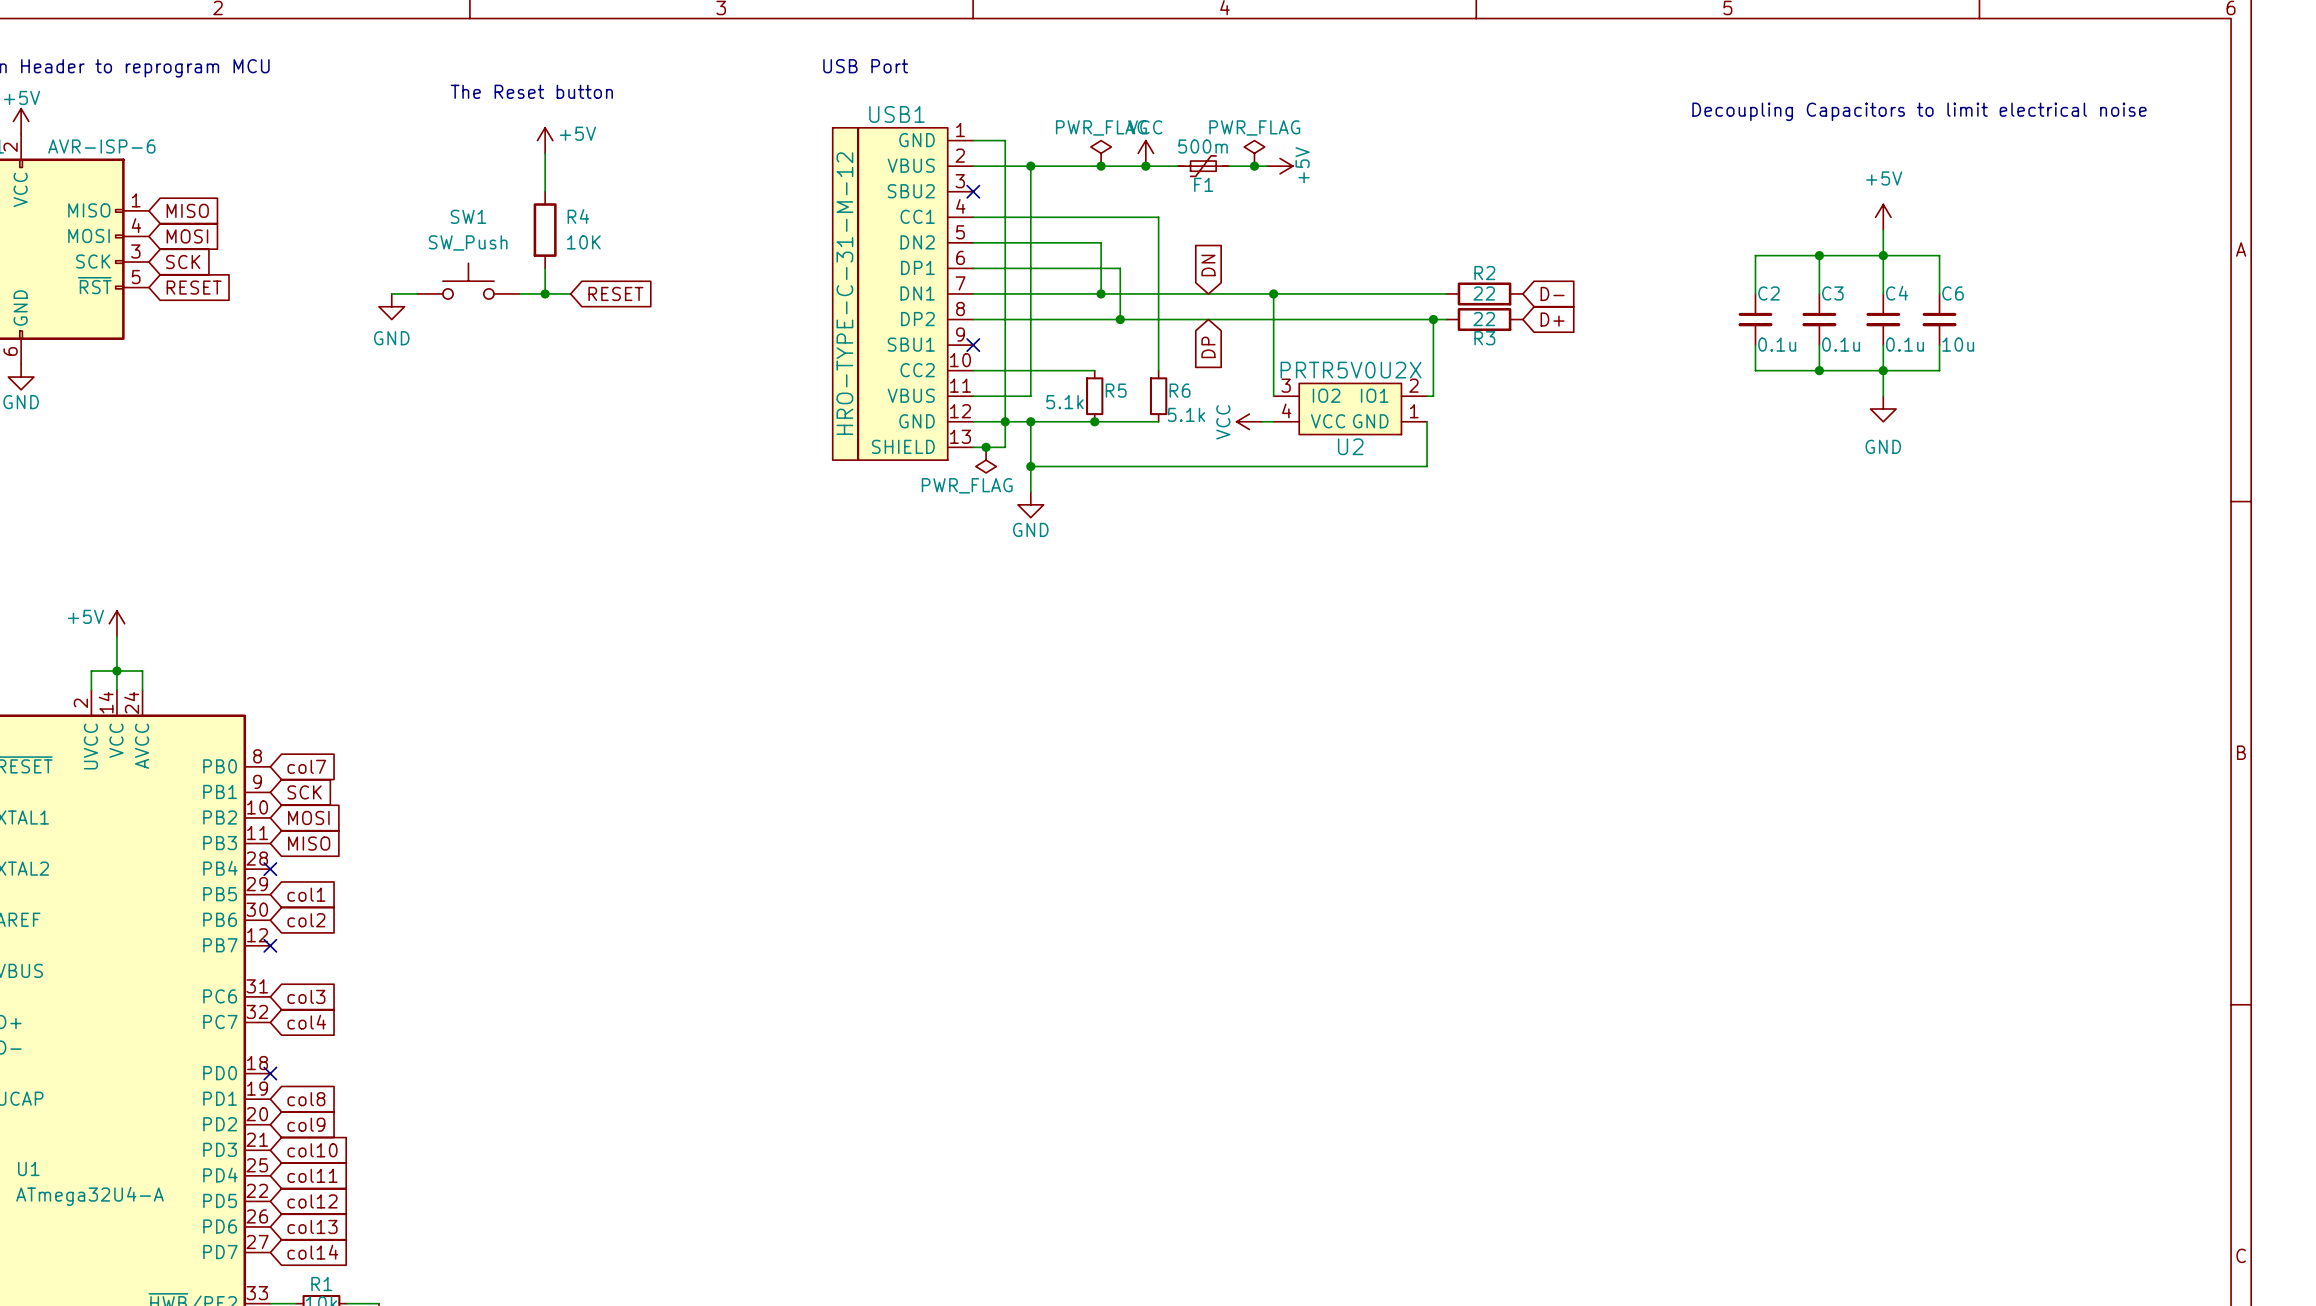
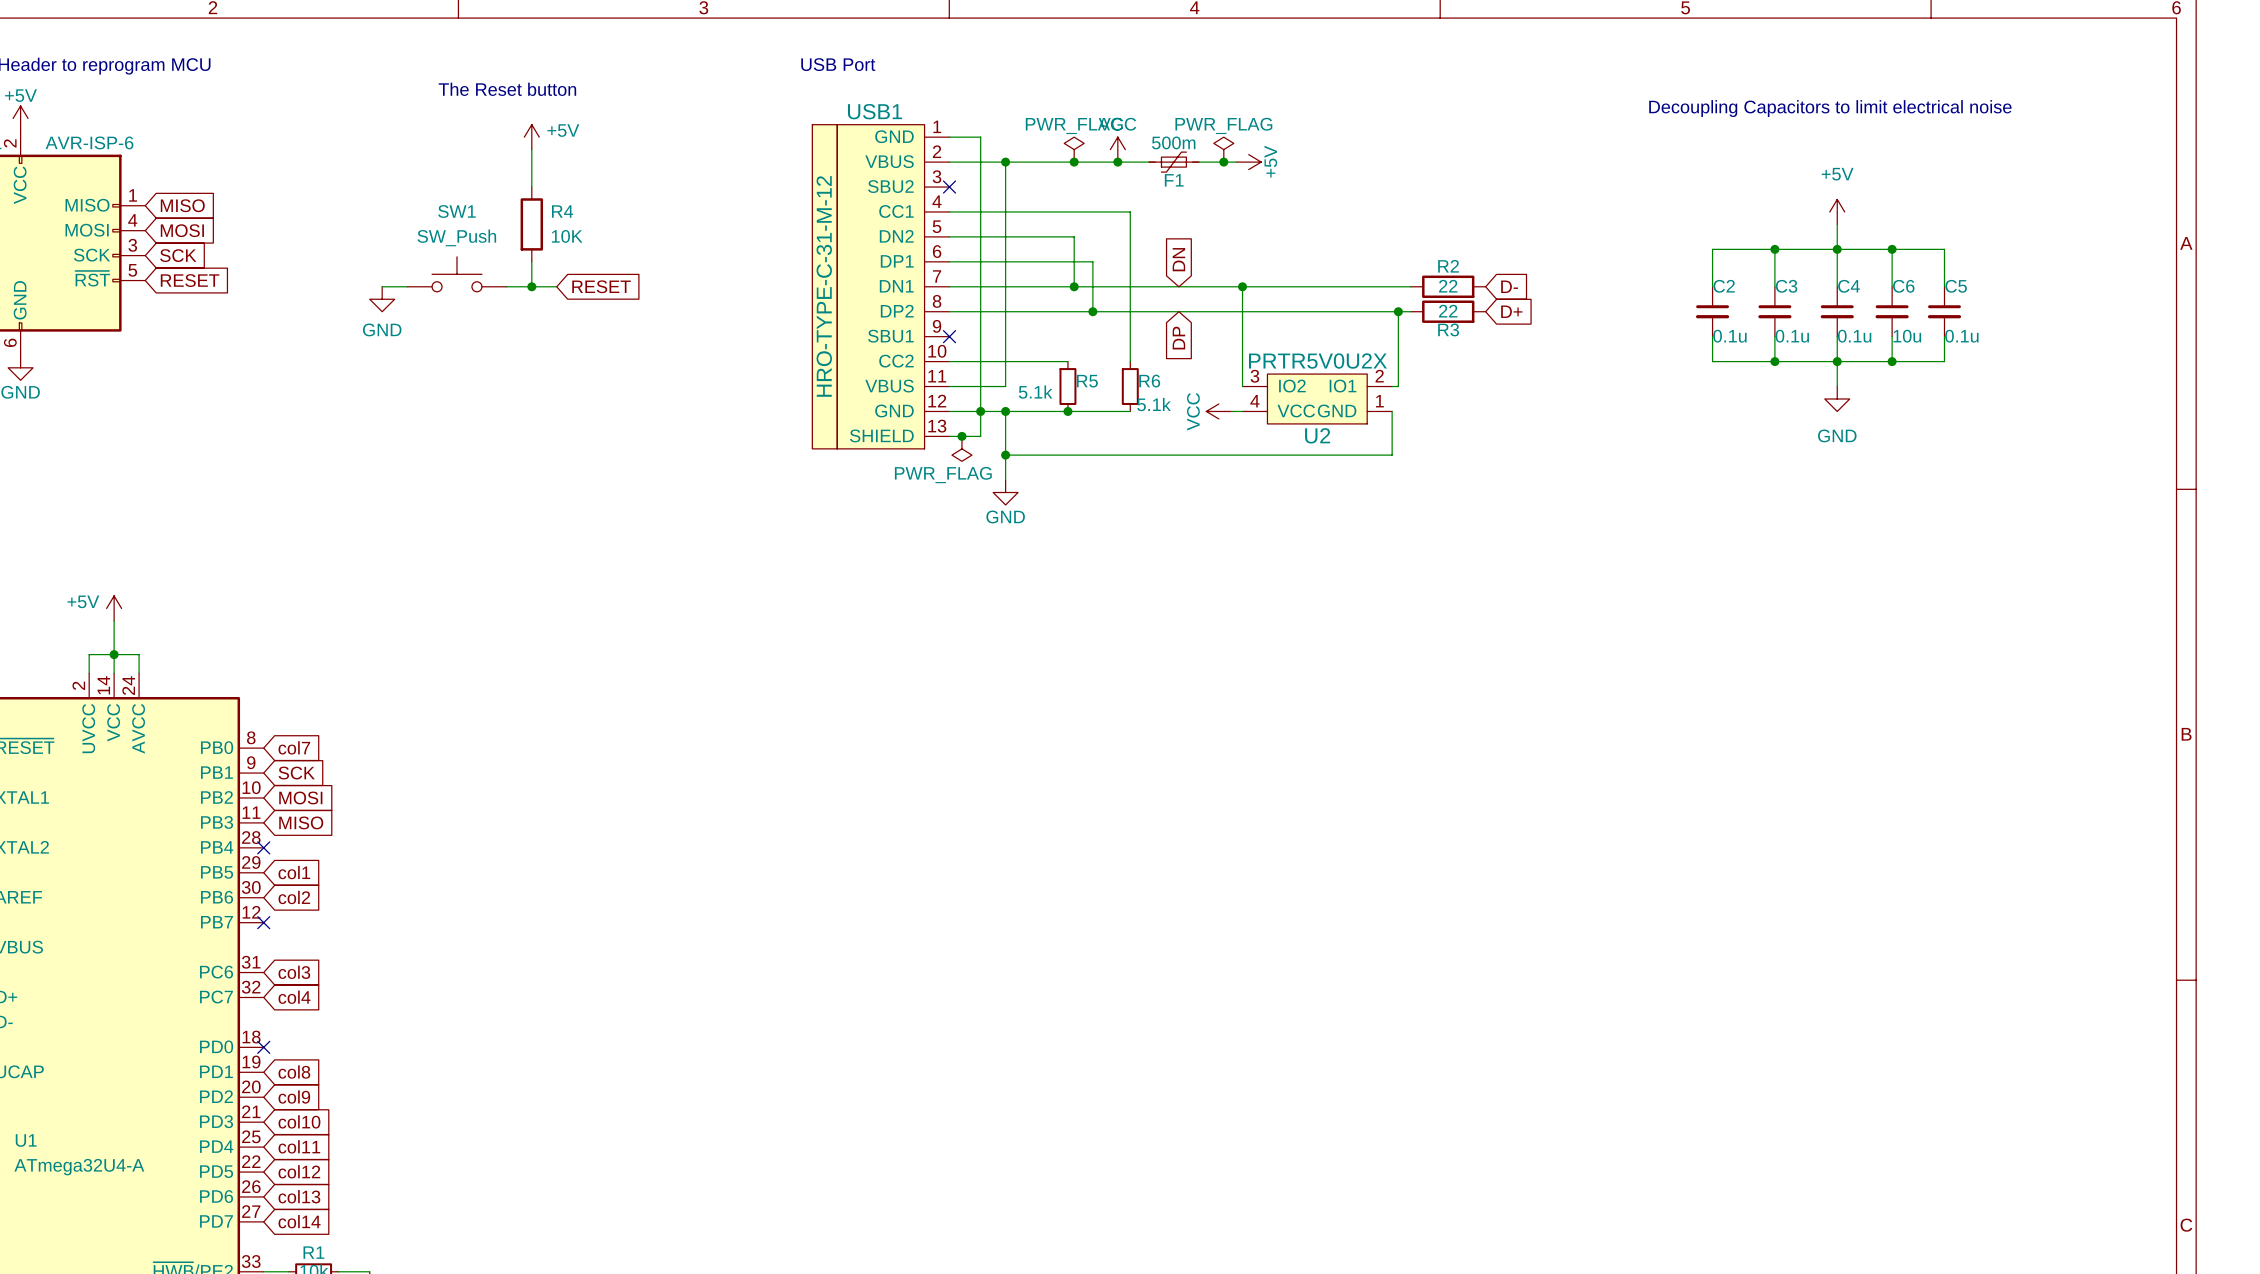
wire: none -> (1892, 249) (1944, 249) (1944, 286)
junction: none -> (1892, 249)
C5: none -> 0.1u (1944, 311)
wire: none -> (1944, 336) (1944, 361) (1892, 361)
junction: none -> (1892, 361)

